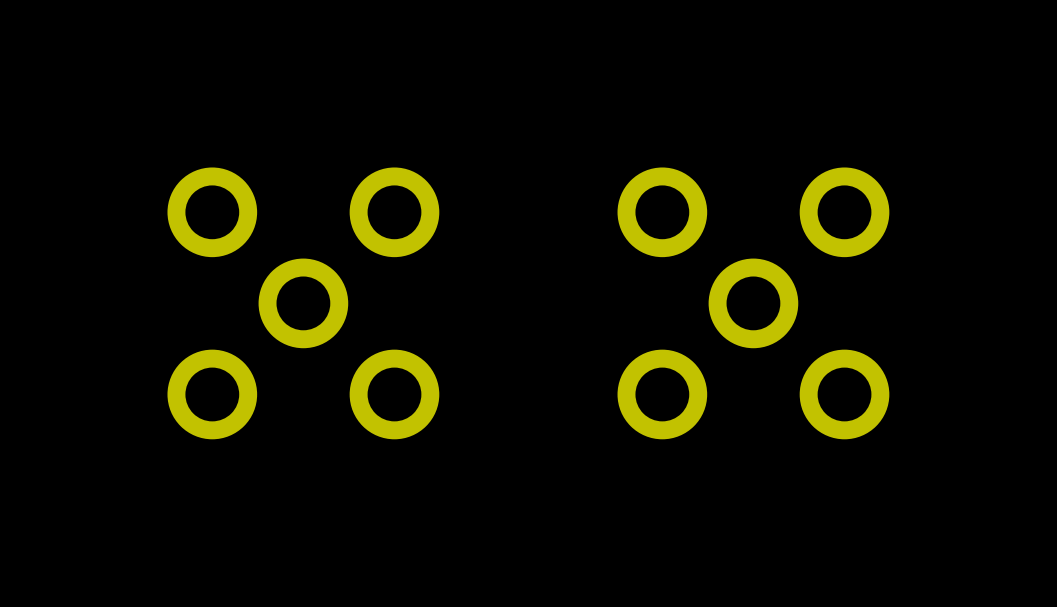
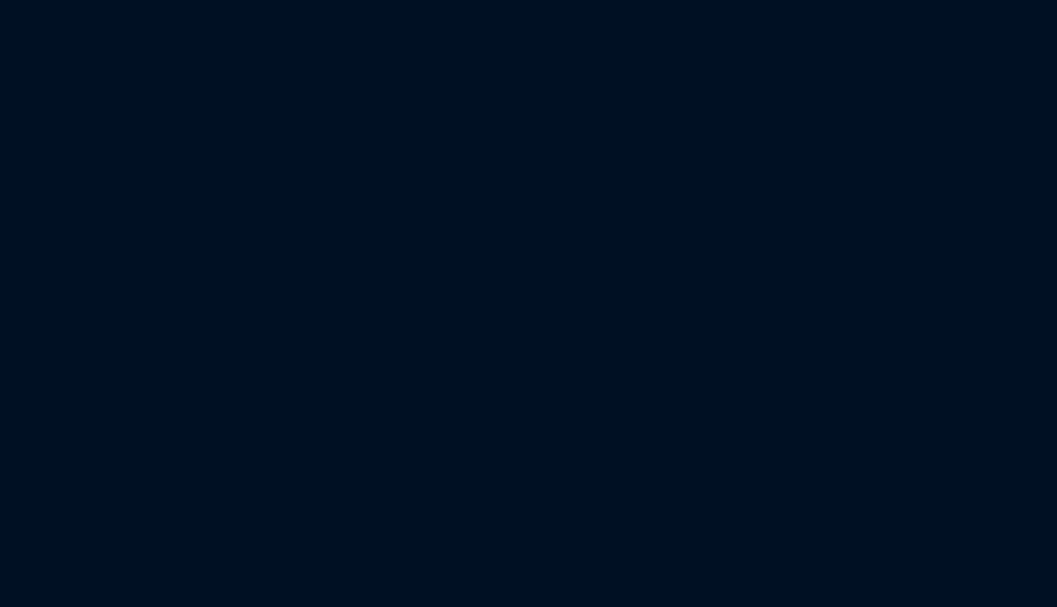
part: (303, 303) -> none
part: (753, 303) -> none

